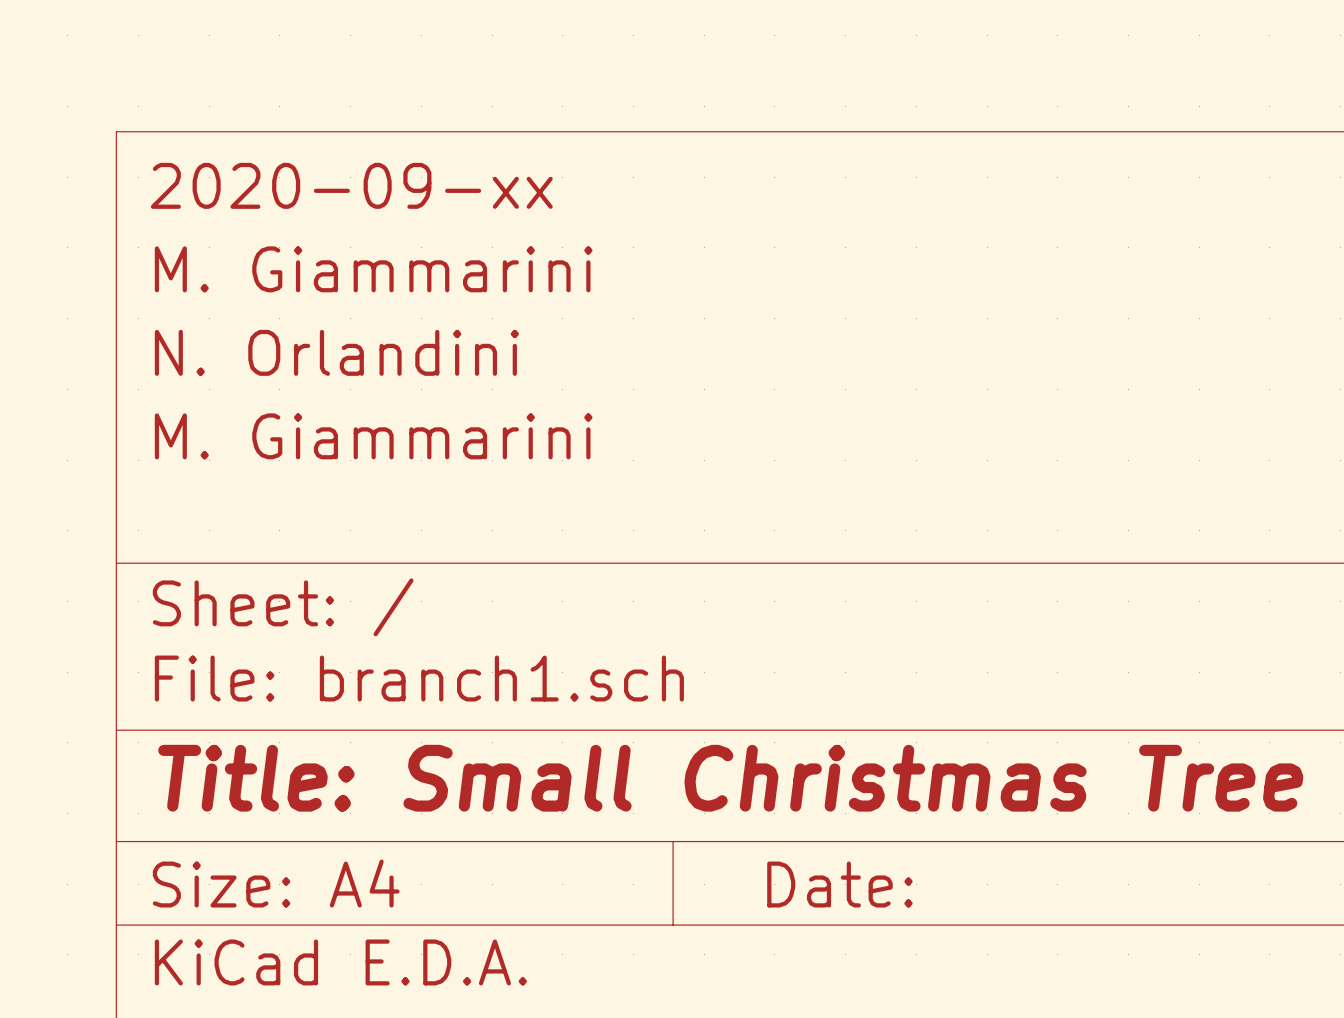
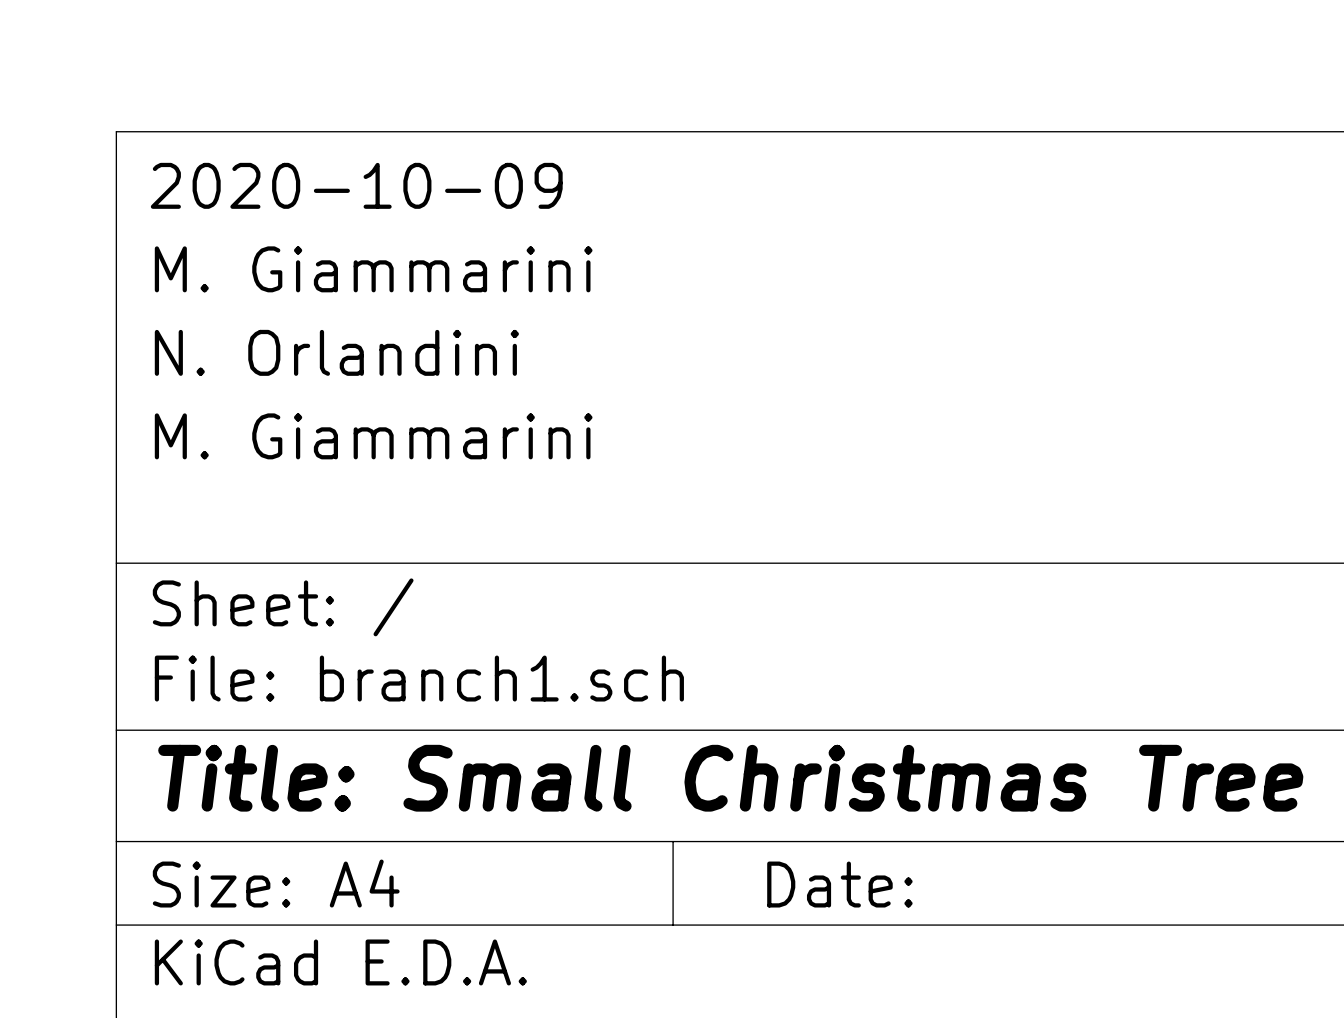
title block: 2020-09-xx (351, 185) -> 2020-10-09 (356, 185)

